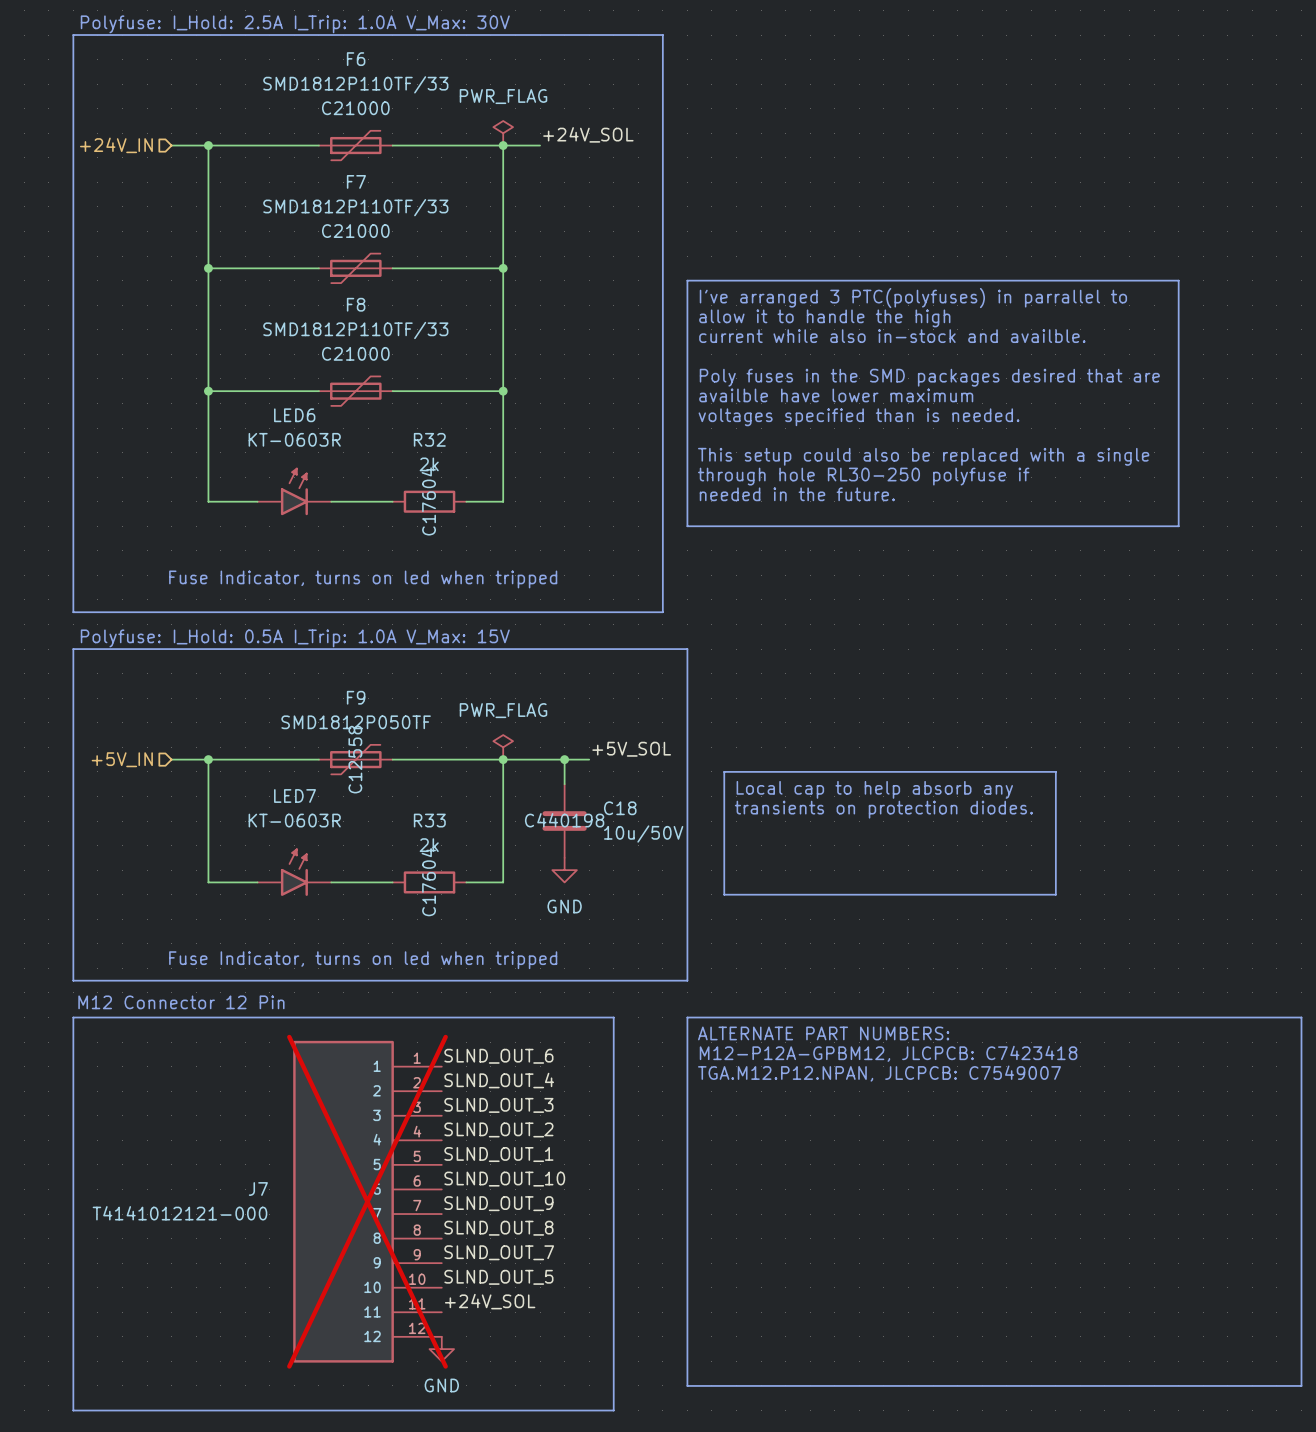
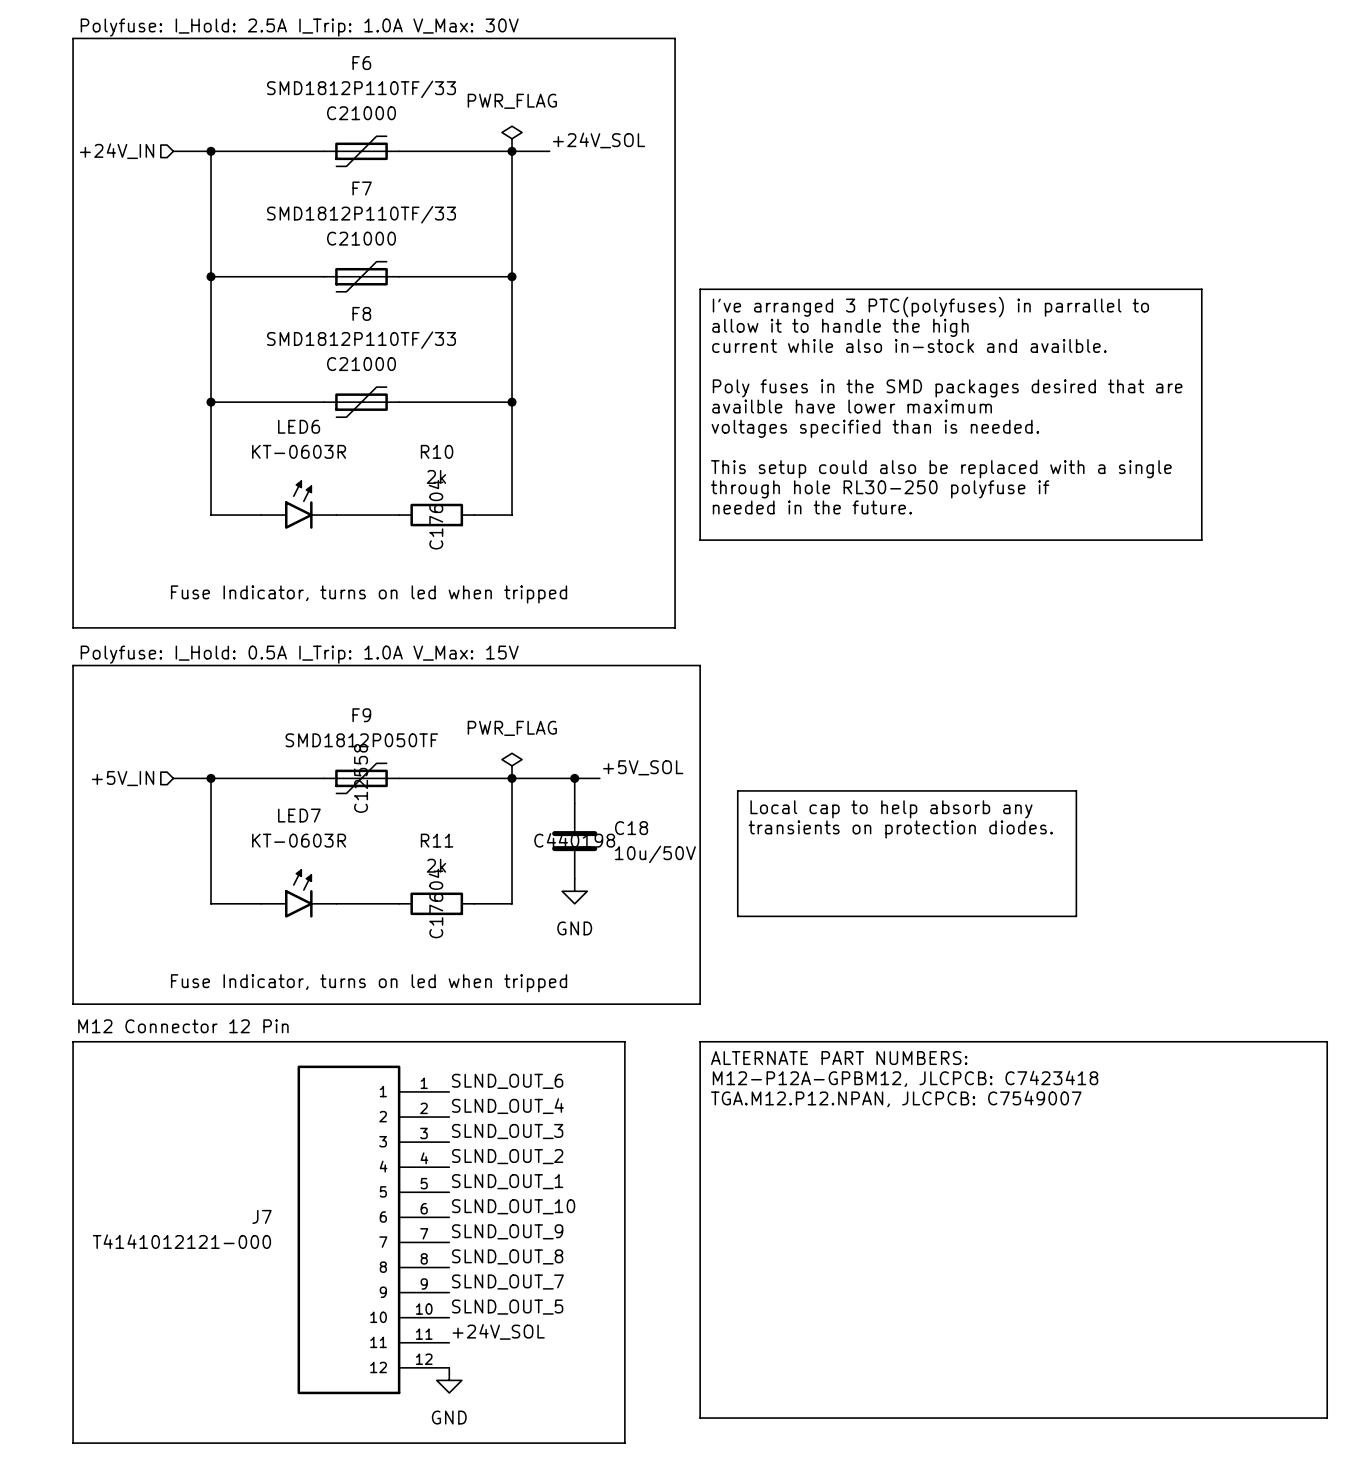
R32 name: R32 (429, 439) -> R10 (437, 451)
R33 name: R33 (429, 820) -> R11 (437, 840)
J7 do-not-place cross: (367, 1201) -> none

